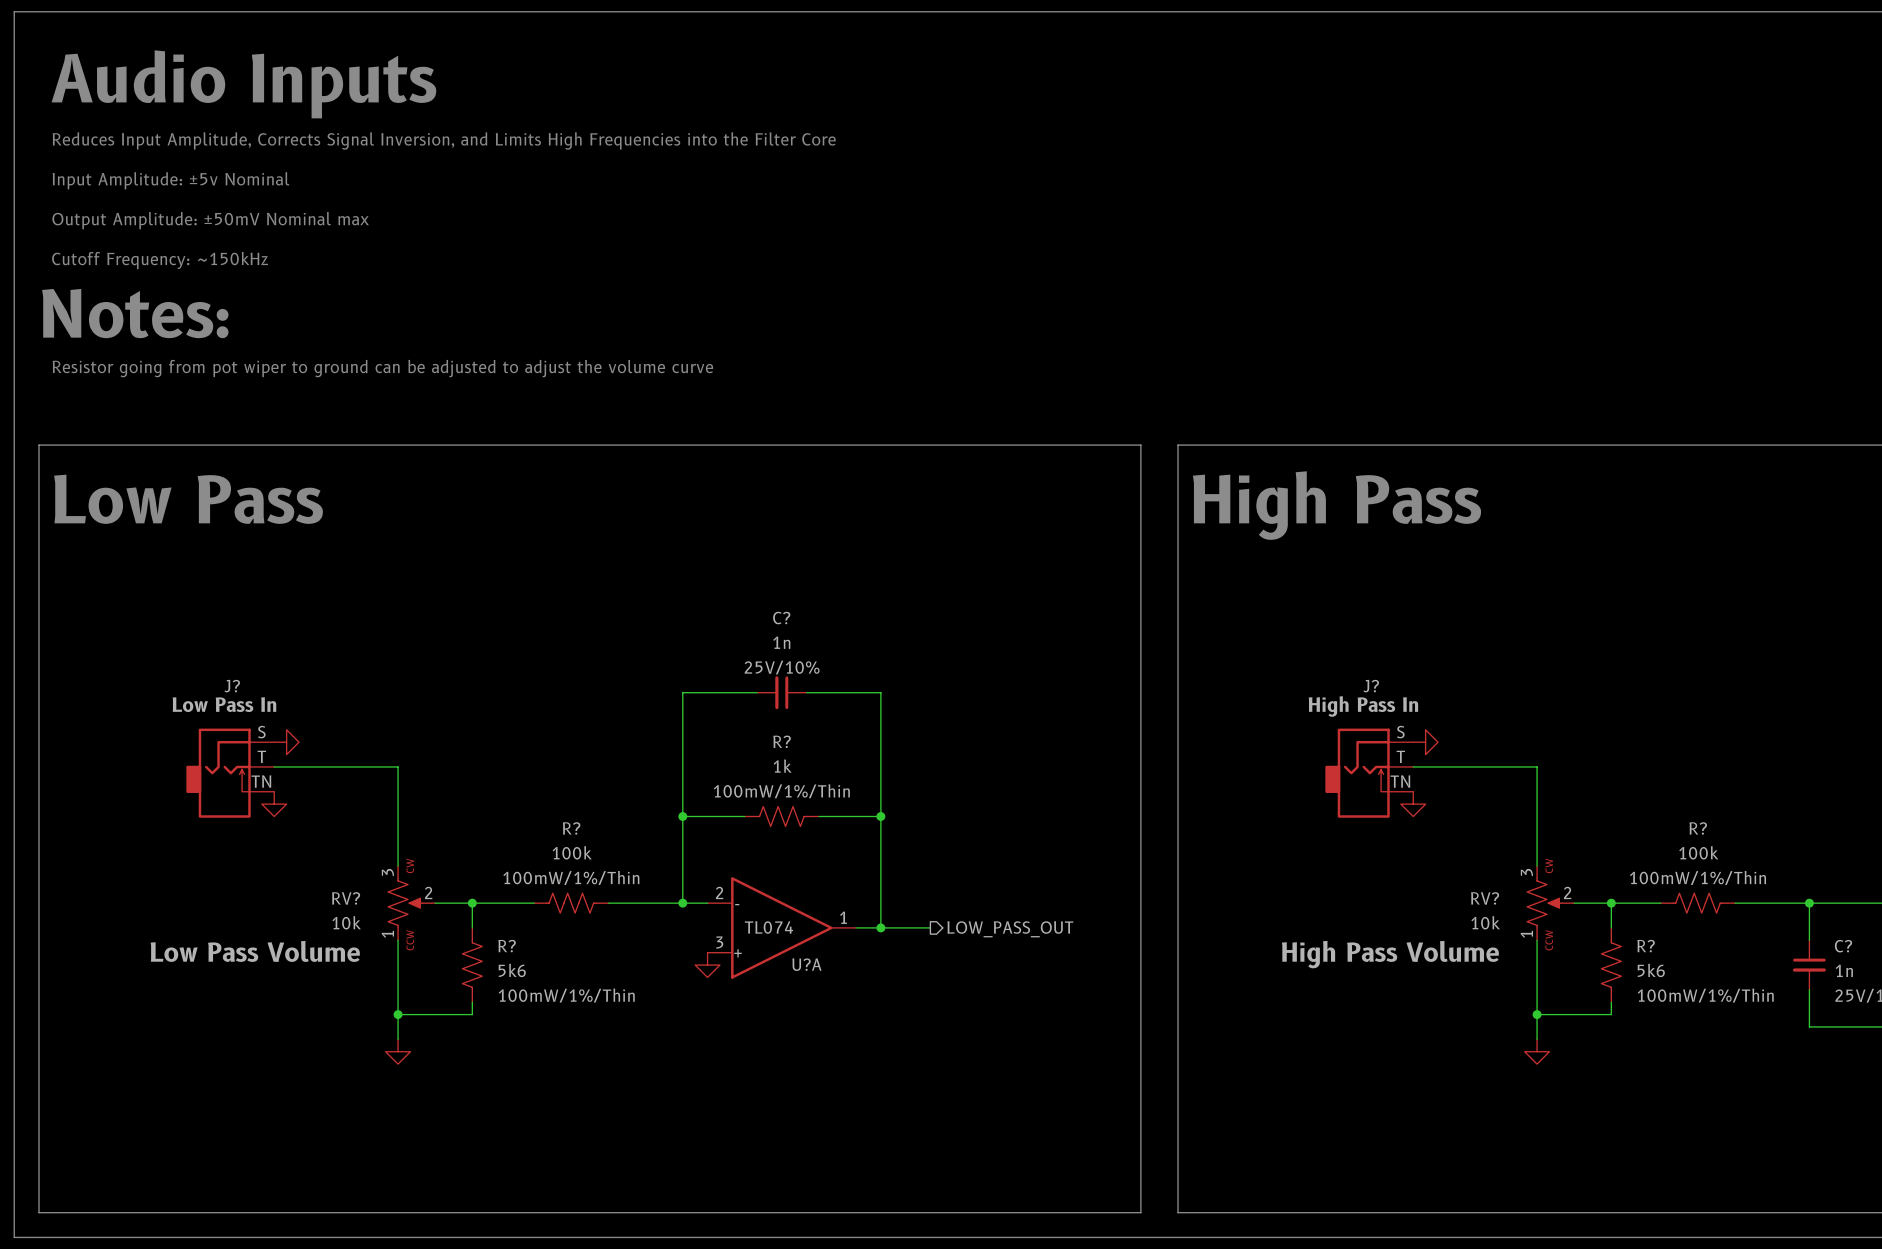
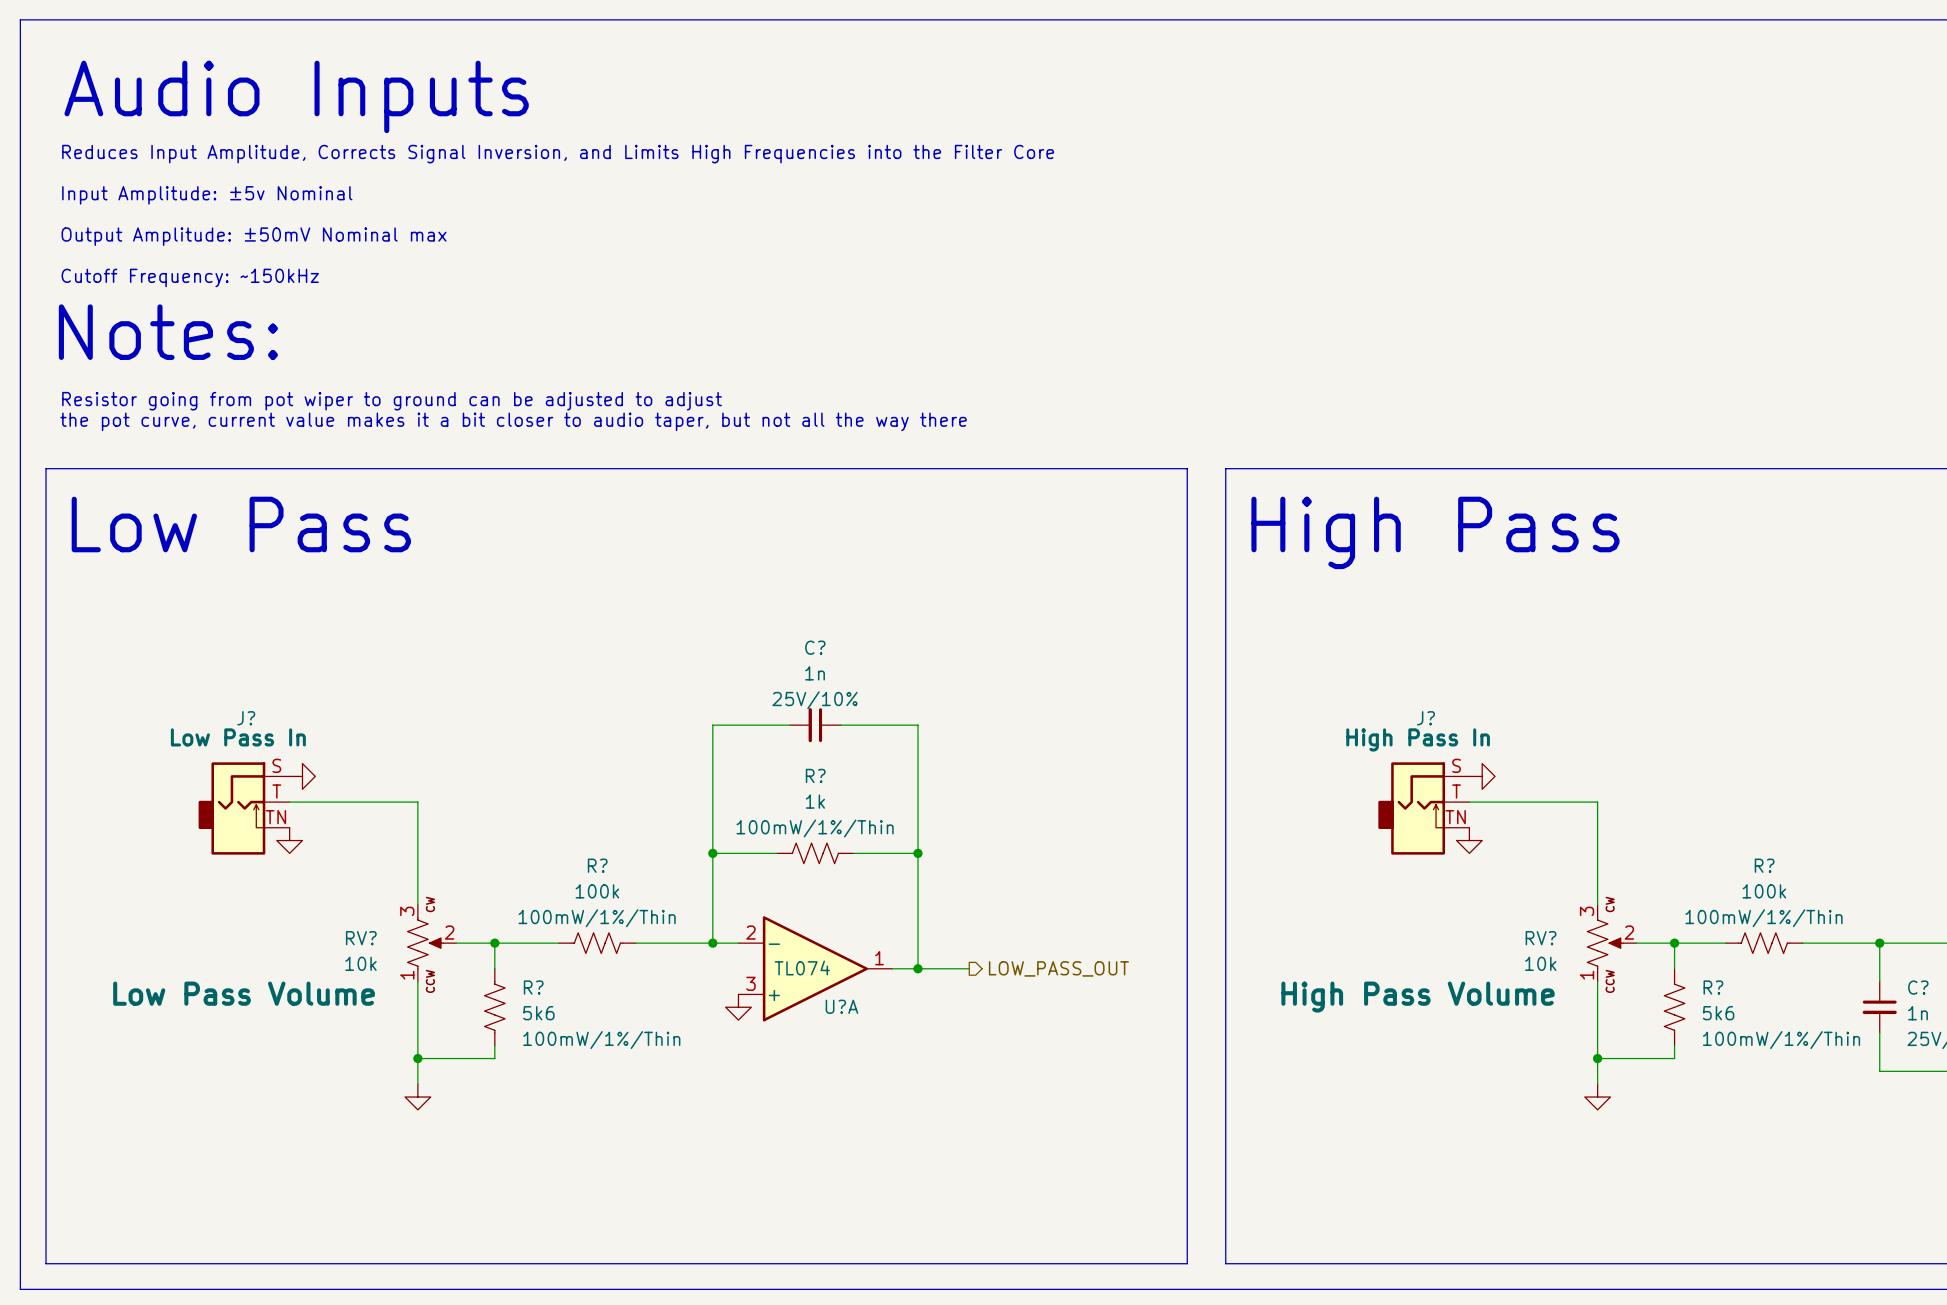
text: Resistor going from pot wiper to ground can be adjusted to adjust the volume curve (382, 368) -> Resistor going from pot wiper to ground can be adjusted to adjust (392, 401)
text: none -> the pot curve, current value makes it a bit closer to audio taper, but not all the way there (513, 421)

